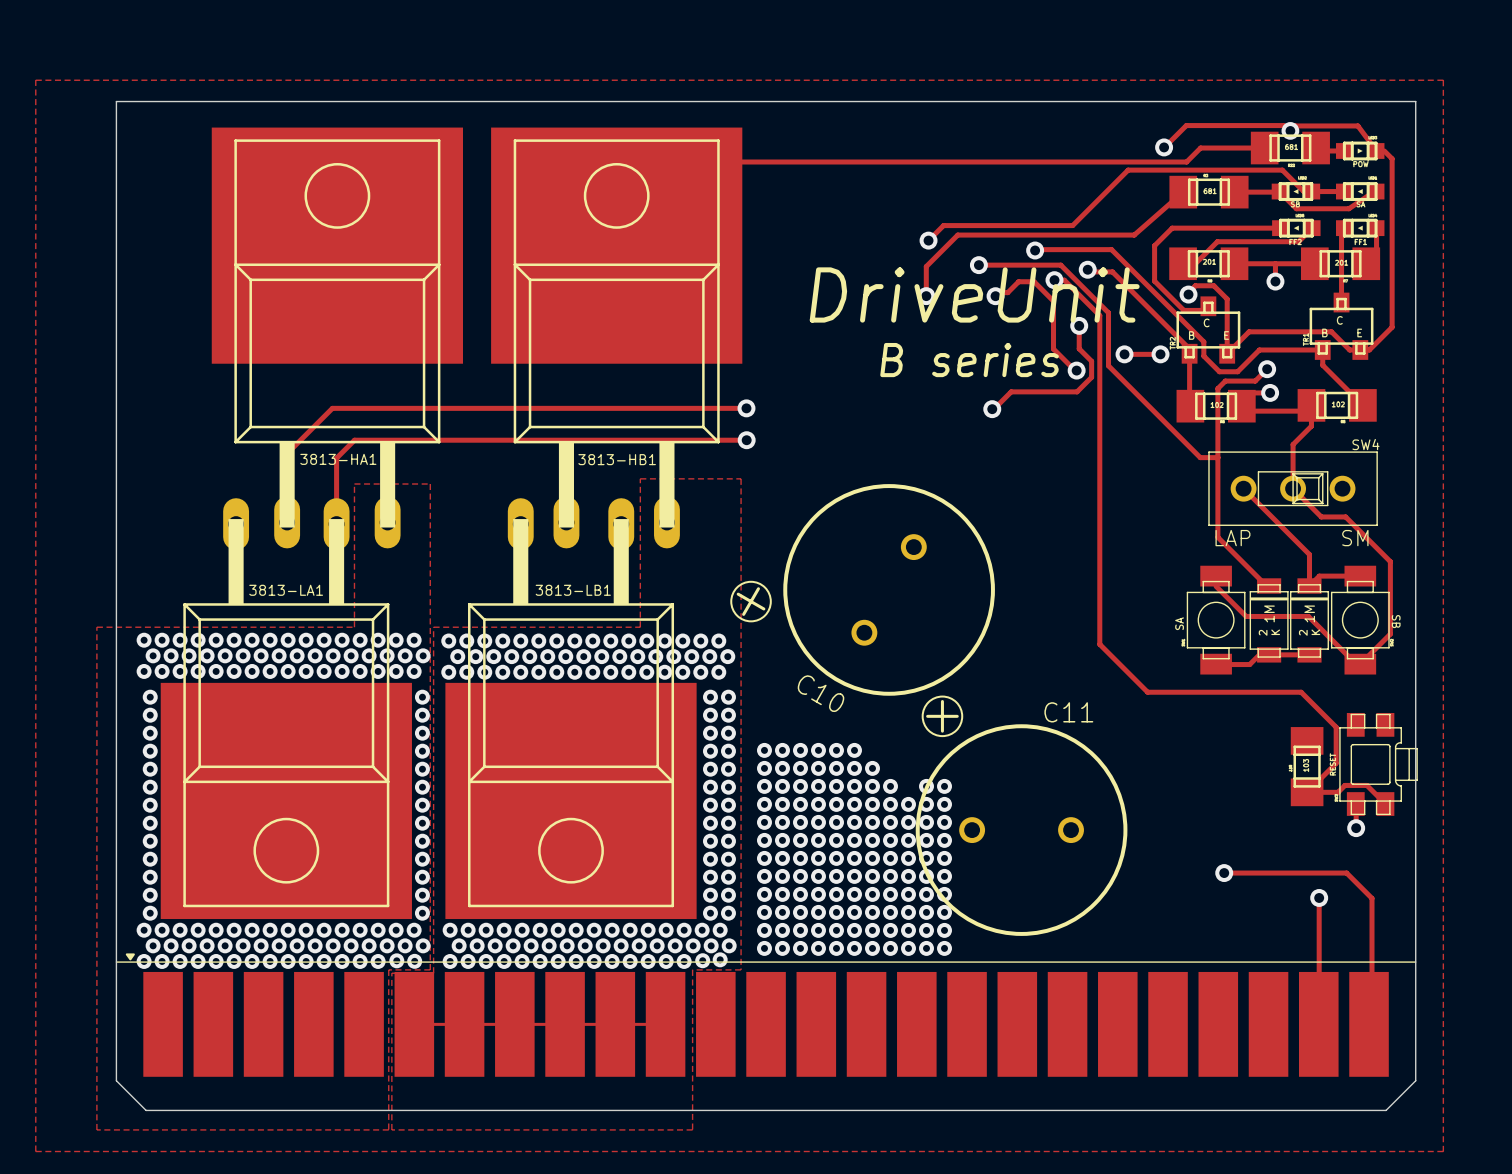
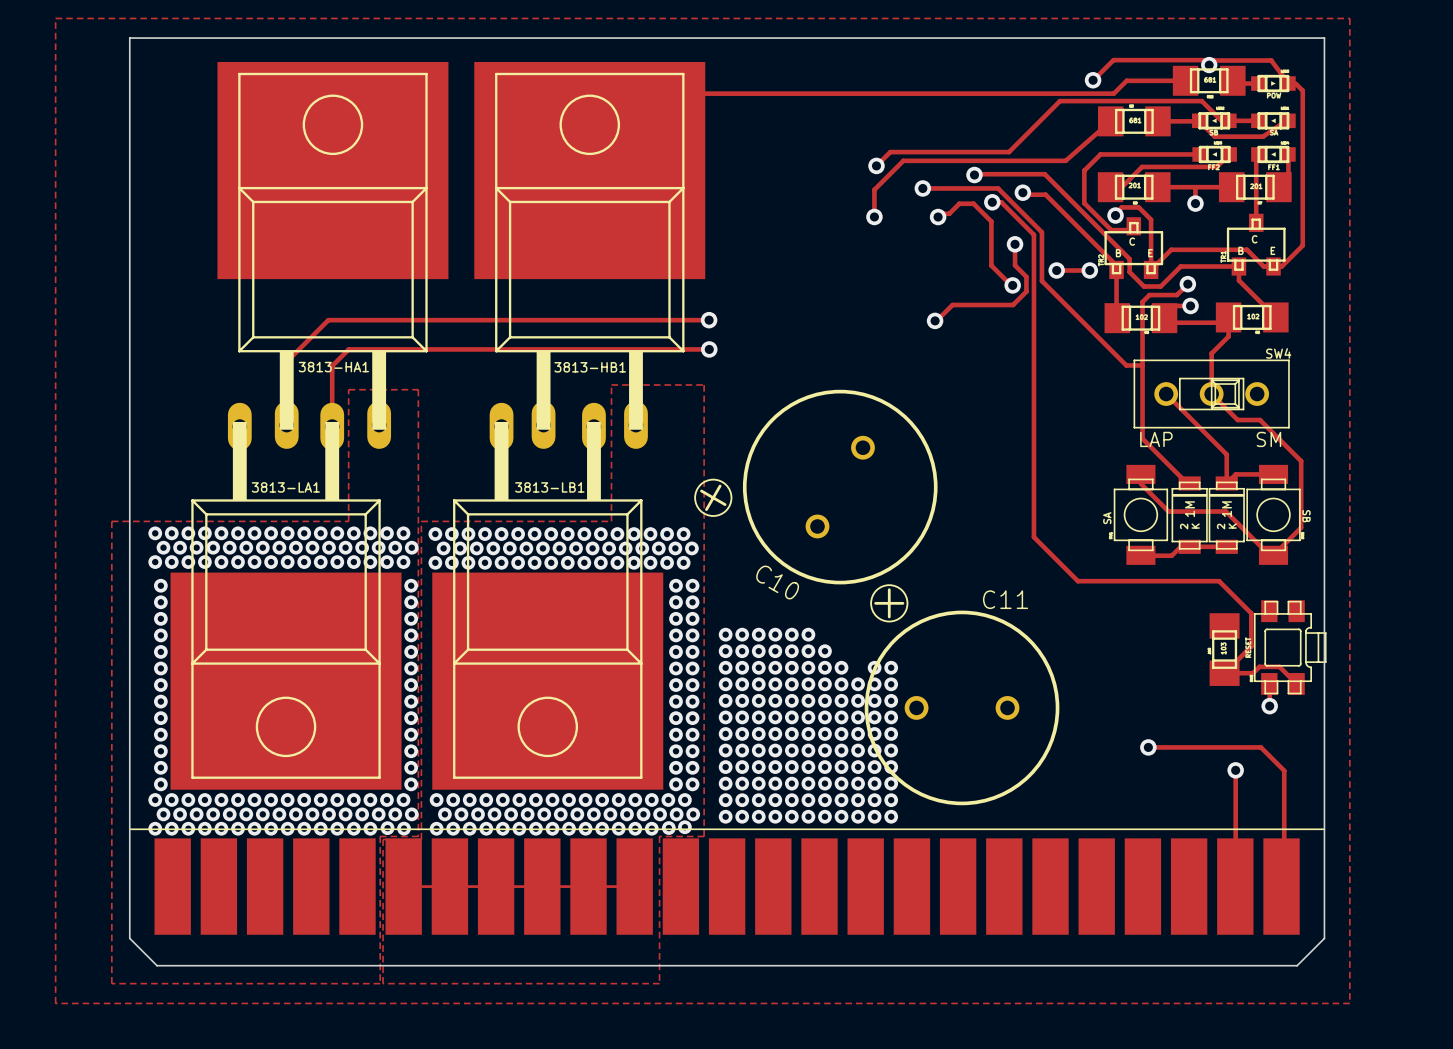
text: DriveUnit (974, 294) -> none
text: B series (969, 360) -> none
drawing: [125, 953, 135, 961] -> none

